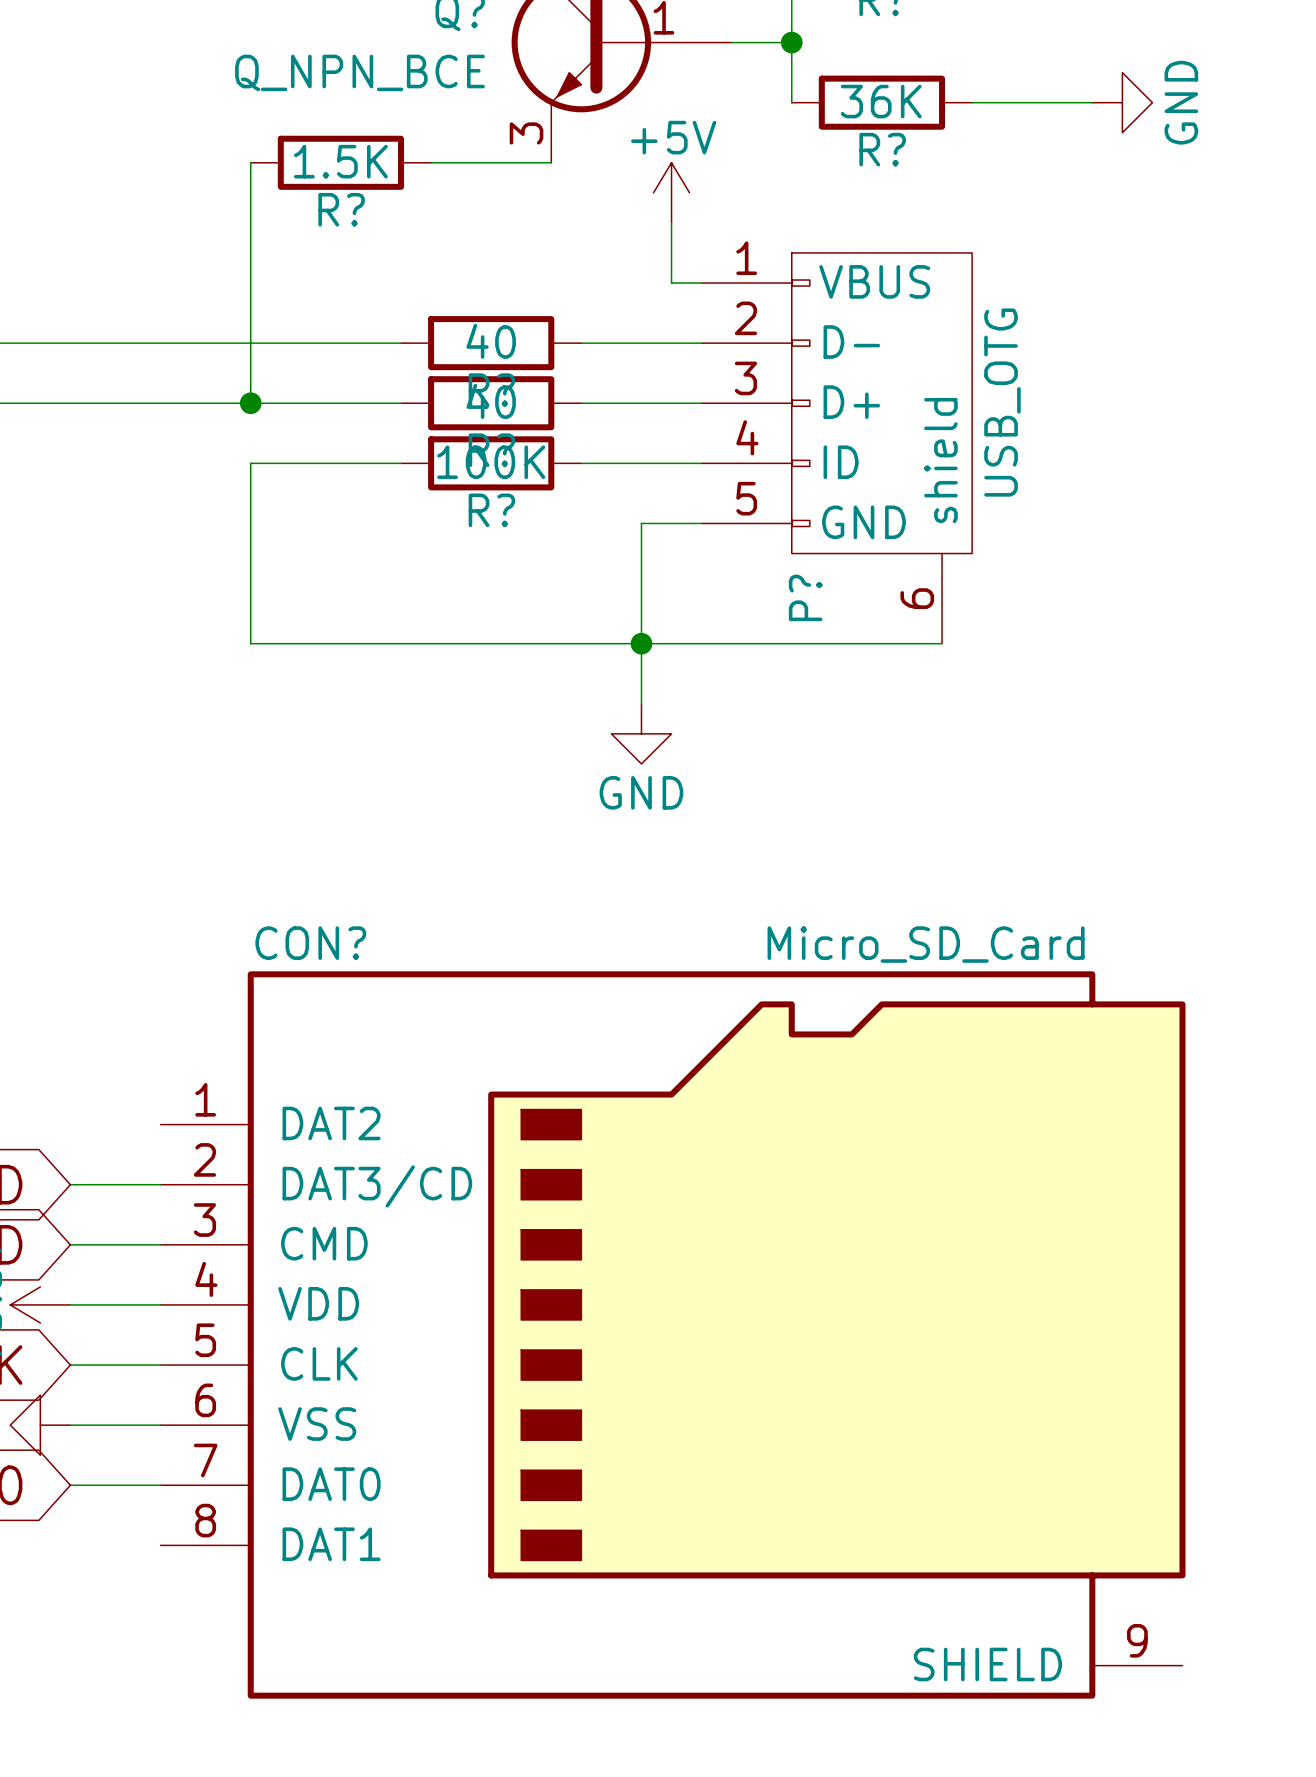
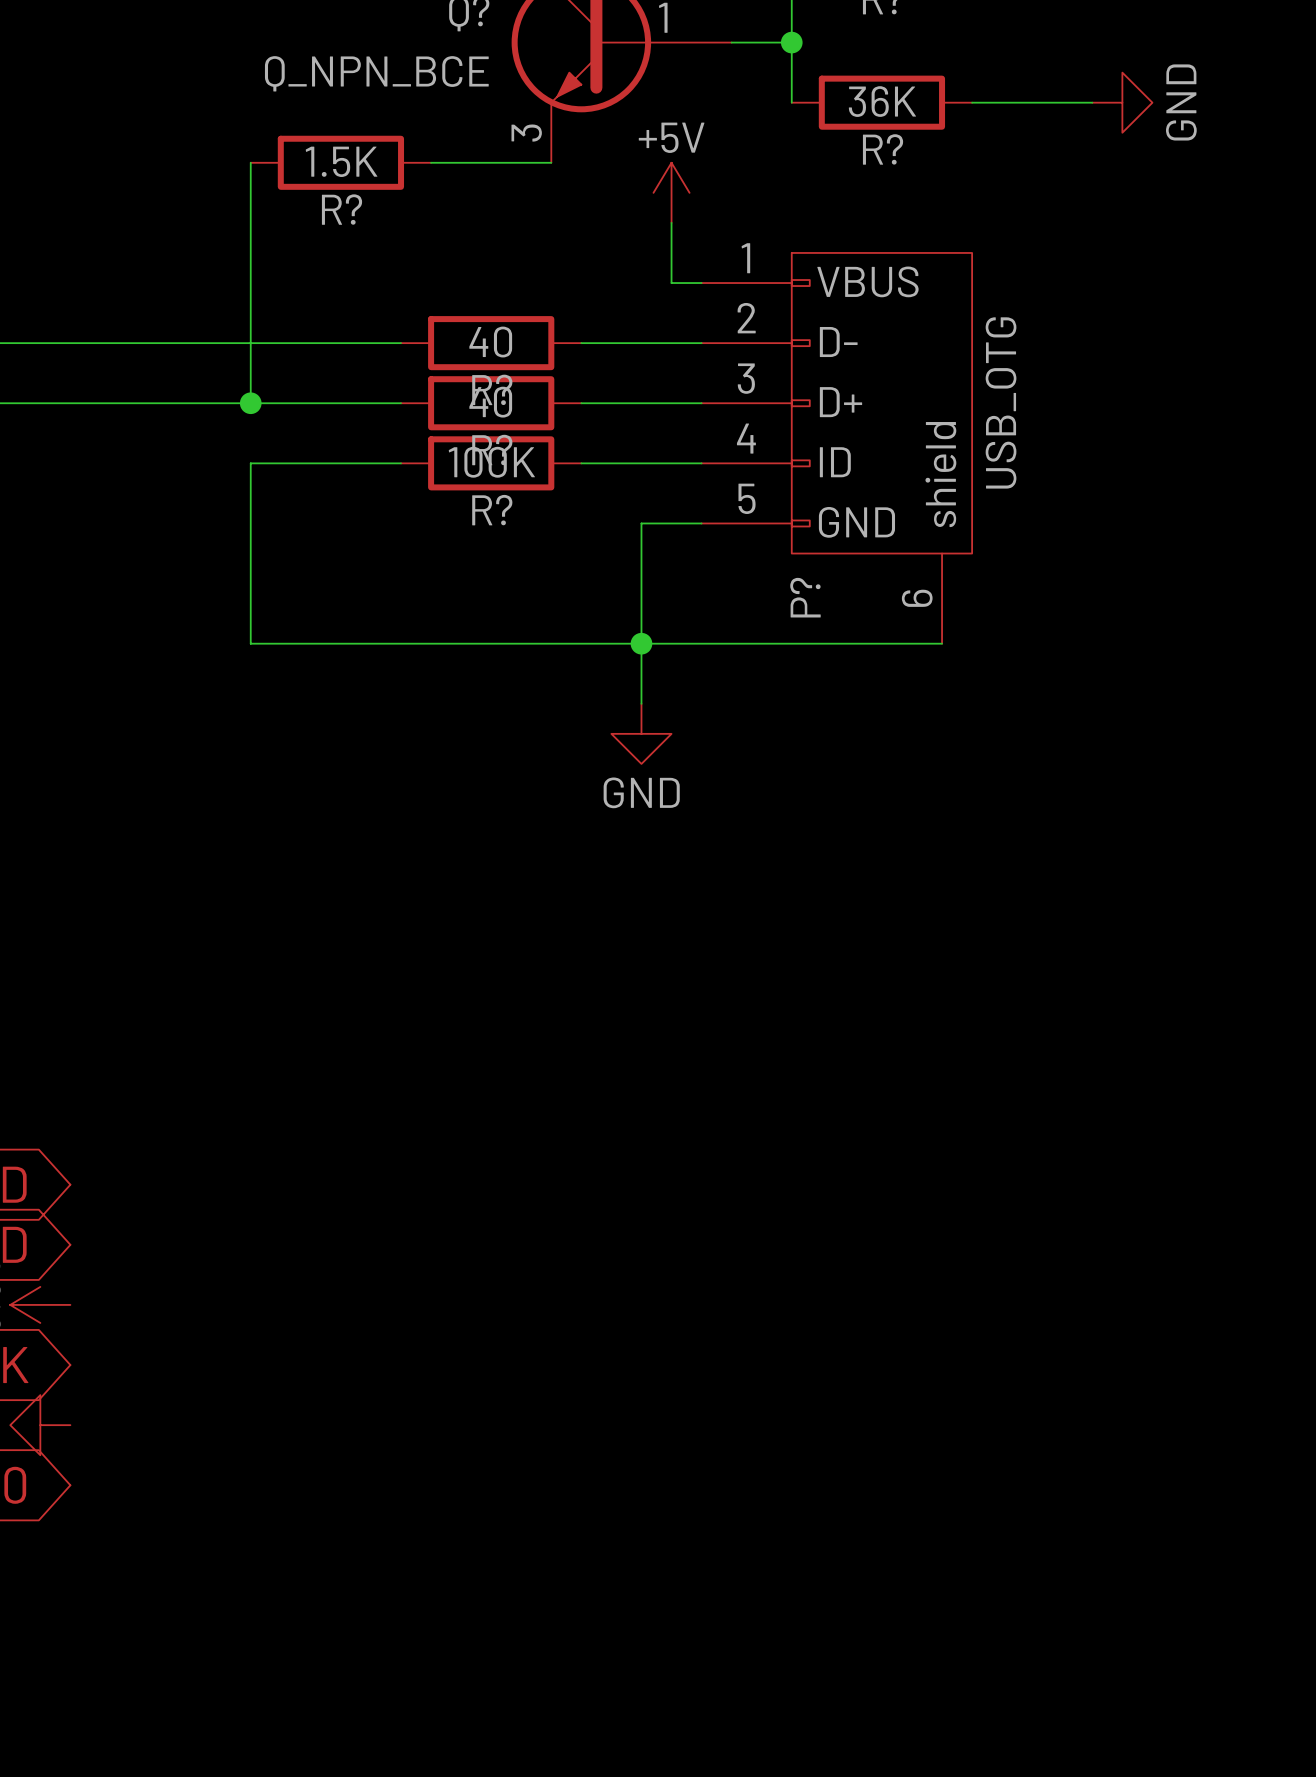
wire: (70, 1184) (160, 1184) -> none
wire: (70, 1244) (160, 1244) -> none
wire: (70, 1304) (160, 1304) -> none
CON?: Micro_SD_Card (673, 1334) -> none
wire: (70, 1365) (160, 1365) -> none
wire: (70, 1425) (160, 1425) -> none
wire: (70, 1485) (160, 1485) -> none

